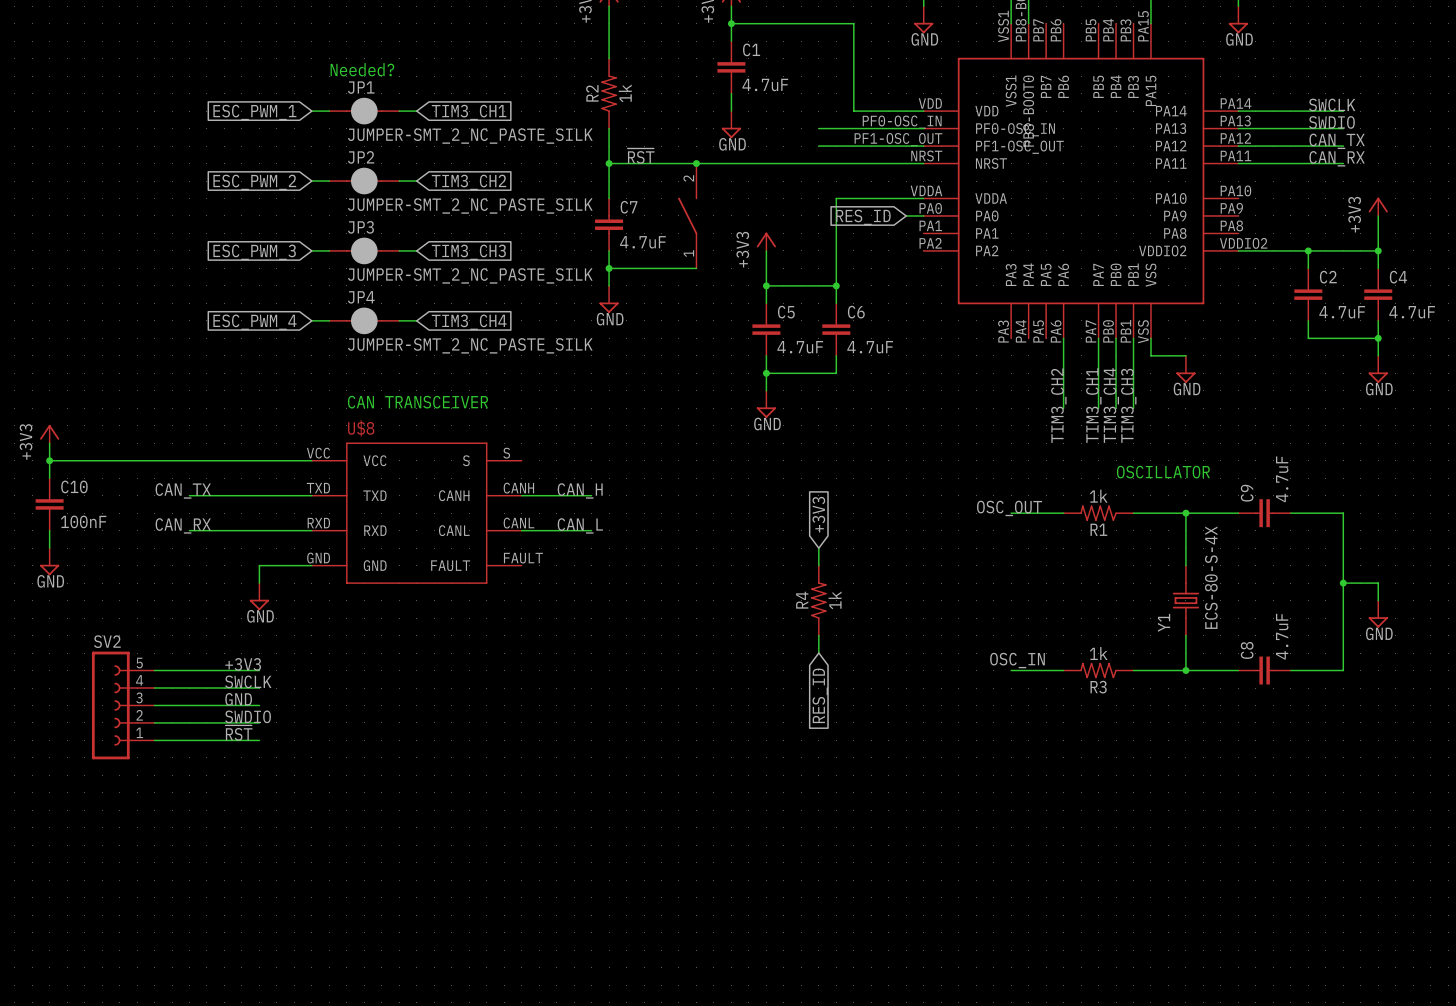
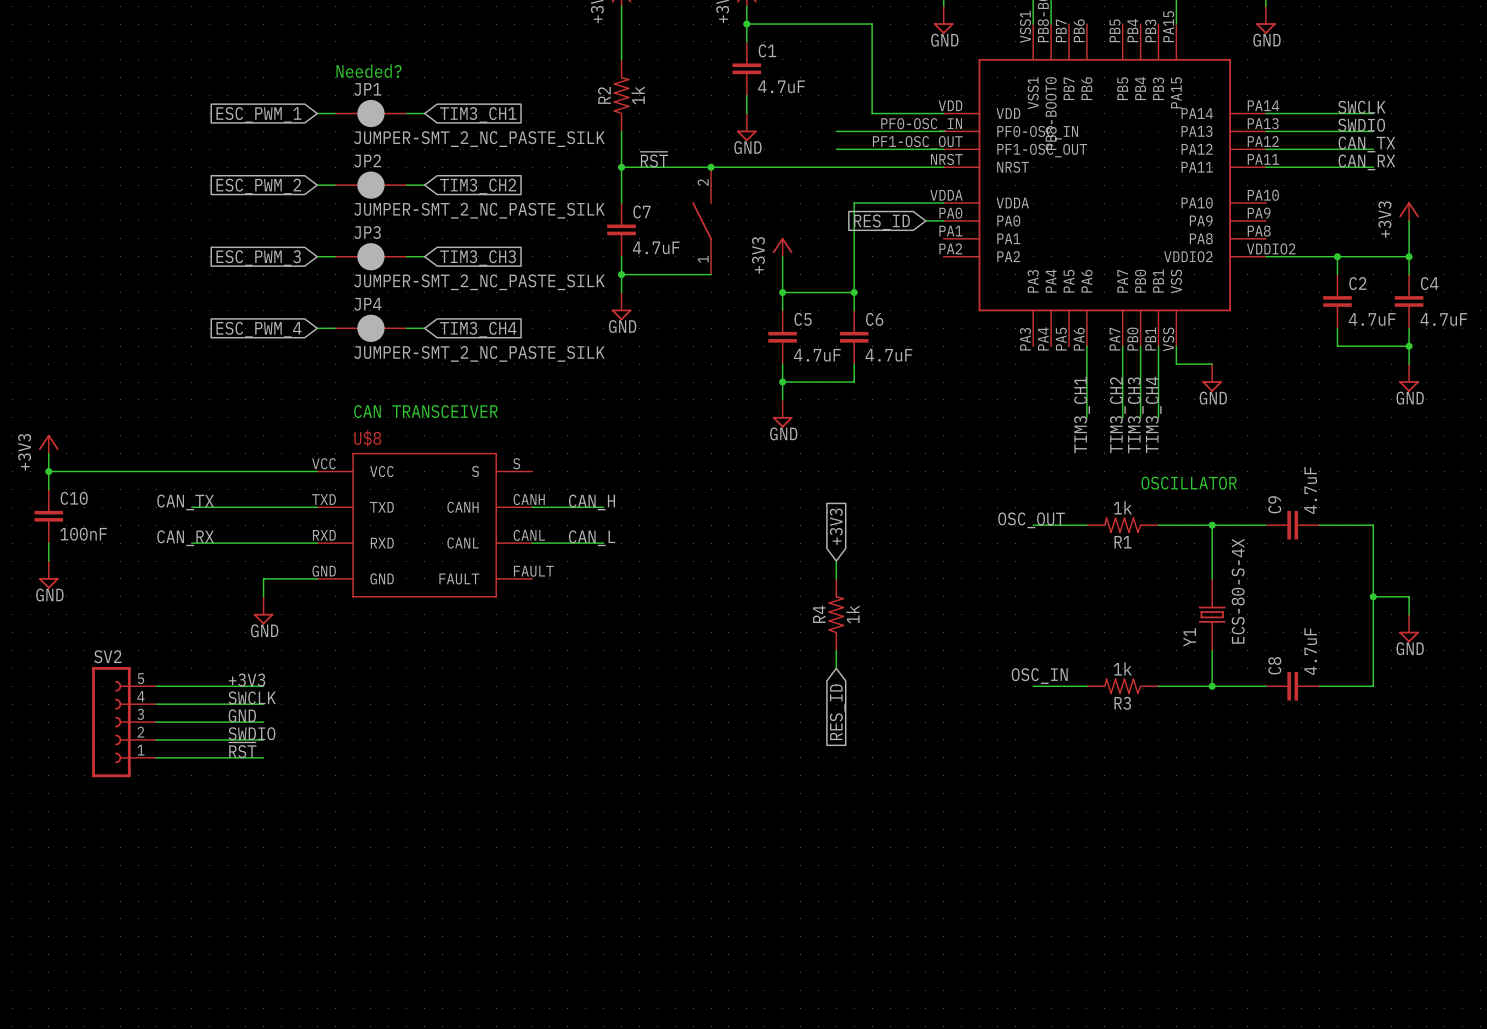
label: TIM3_CH2 (1058, 405) -> TIM3_CH1 (1082, 415)
label: TIM3_CH1 (1093, 405) -> TIM3_CH2 (1117, 415)
label: TIM3_CH4 (1111, 405) -> TIM3_CH3 (1135, 415)
label: TIM3_CH3 (1128, 405) -> TIM3_CH4 (1153, 414)

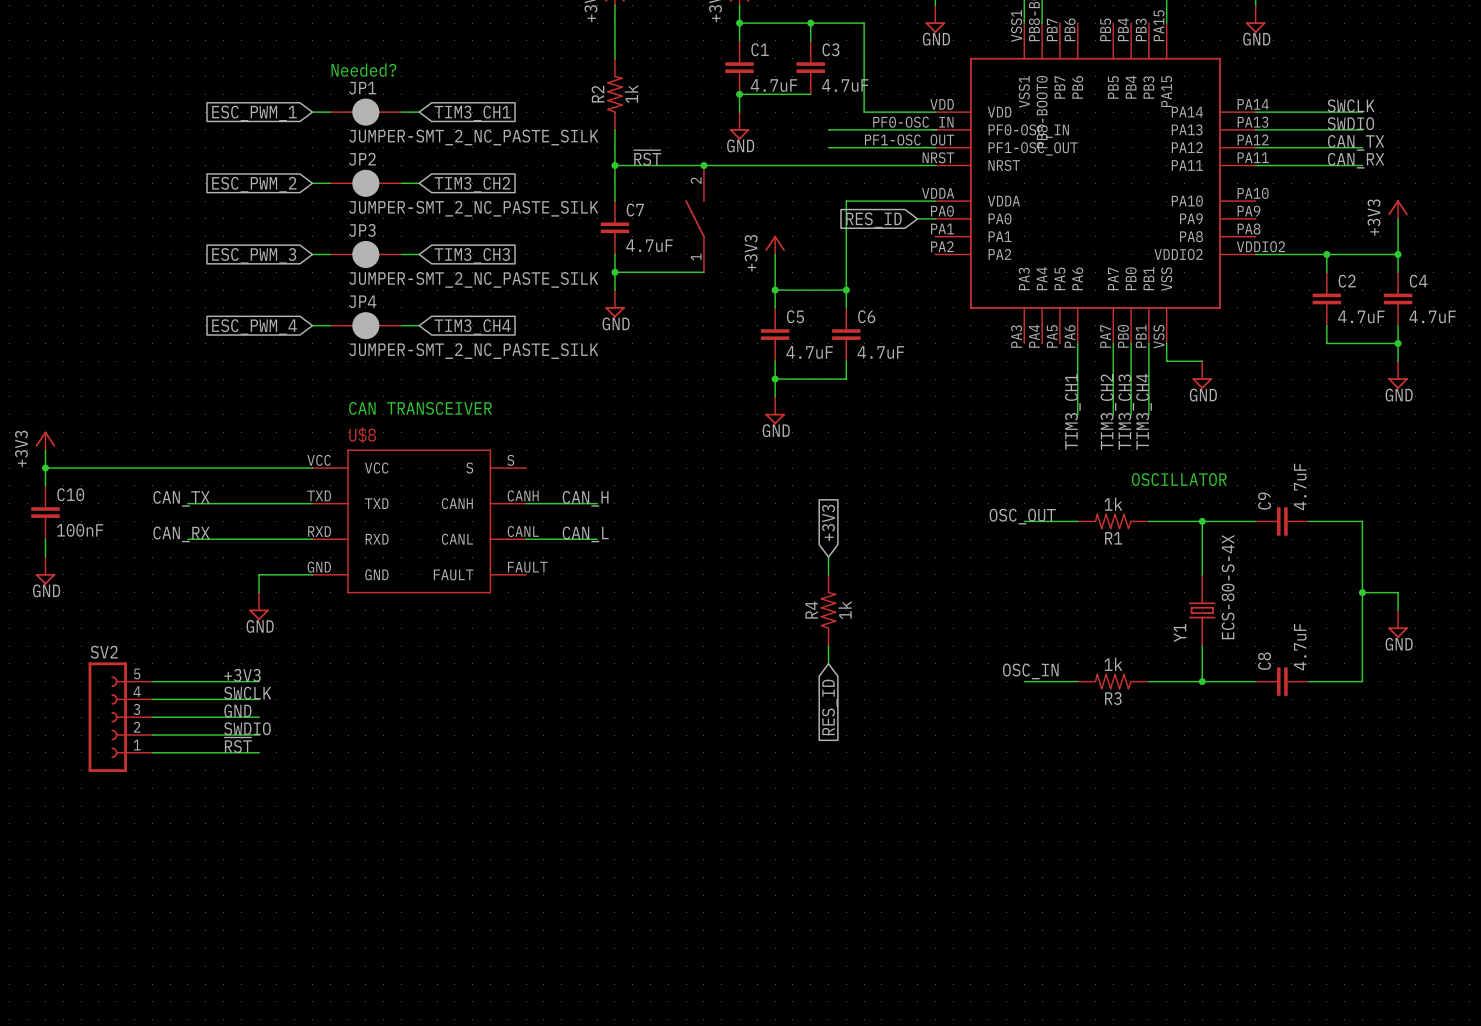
wire: none -> (810, 23) (810, 40)
junction: none -> (810, 23)
C3: none -> 4.7uF (810, 67)
wire: none -> (739, 94) (810, 94)
junction: none -> (739, 94)

